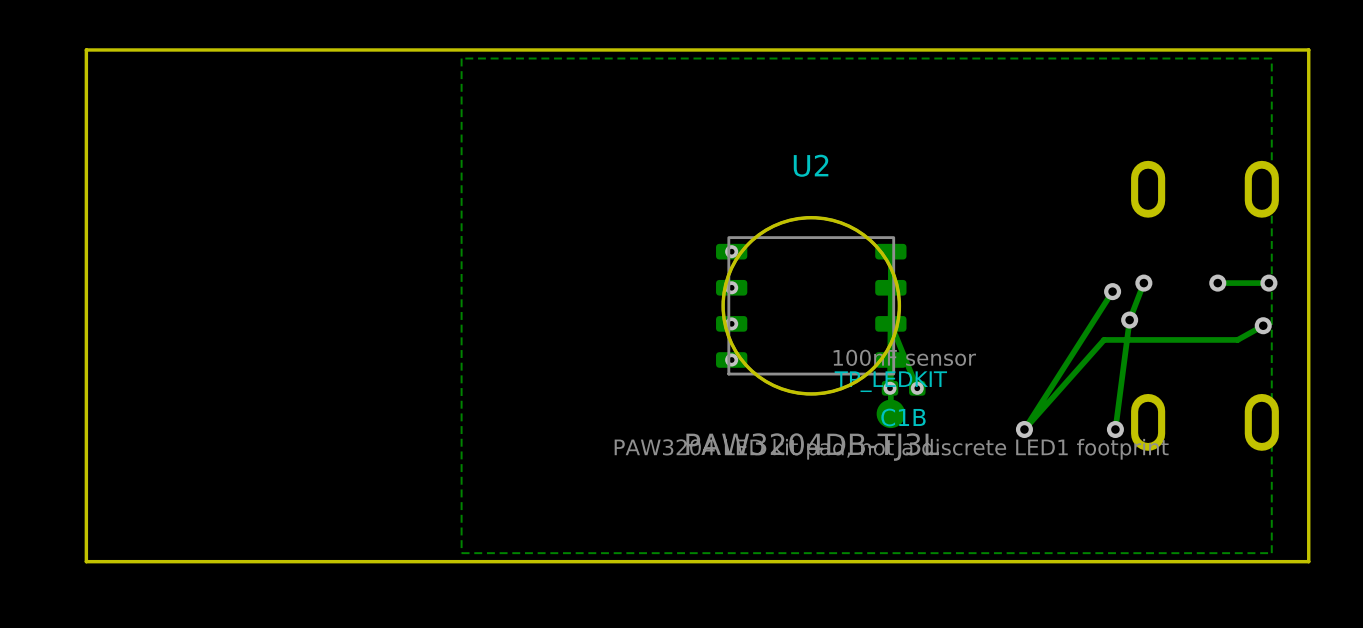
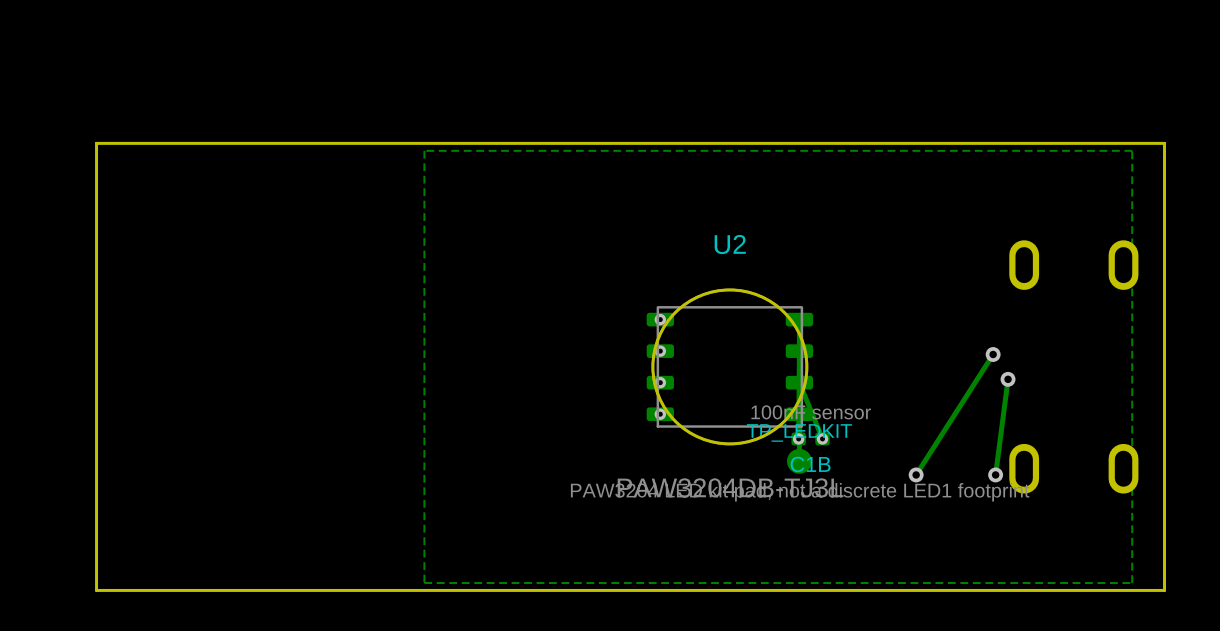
track: (1143, 283) (1129, 320) -> none
via: (1143, 283) -> none
via: (1217, 283) -> none
track: (1268, 283) (1217, 283) -> none
via: (1268, 283) -> none
track: (1263, 325) (1237, 339) (1104, 339) (1024, 429) -> none
via: (1263, 325) -> none

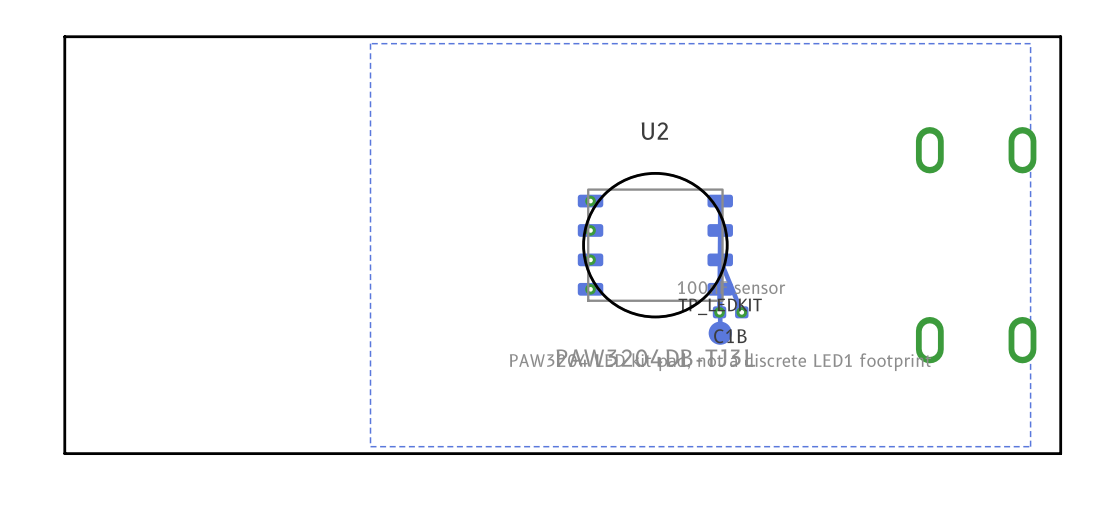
track: (993, 354) (916, 474) -> none
via: (993, 354) -> none
track: (1008, 379) (995, 474) -> none
via: (1008, 379) -> none
via: (916, 474) -> none
via: (995, 474) -> none

